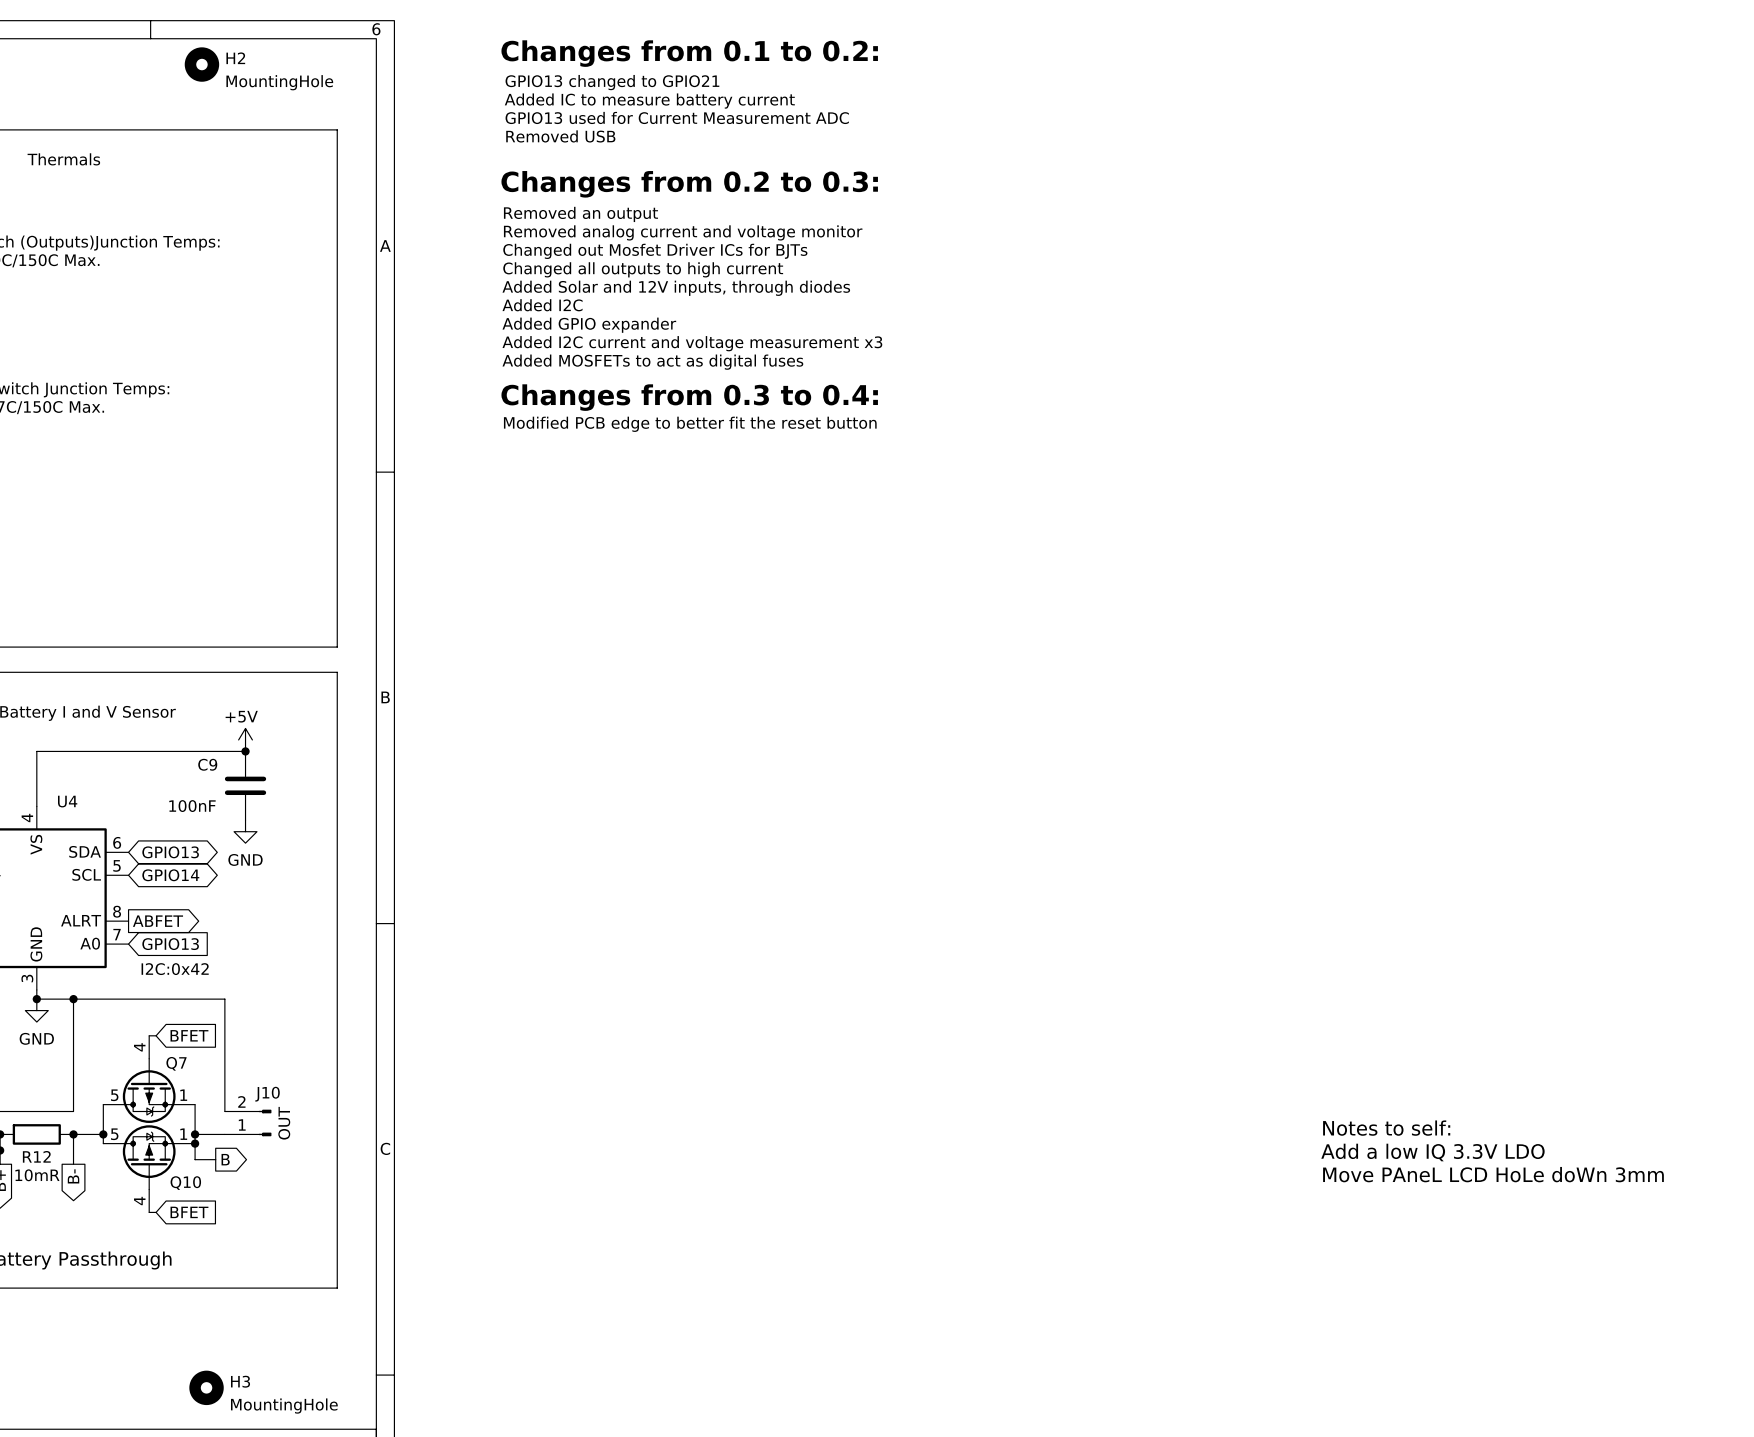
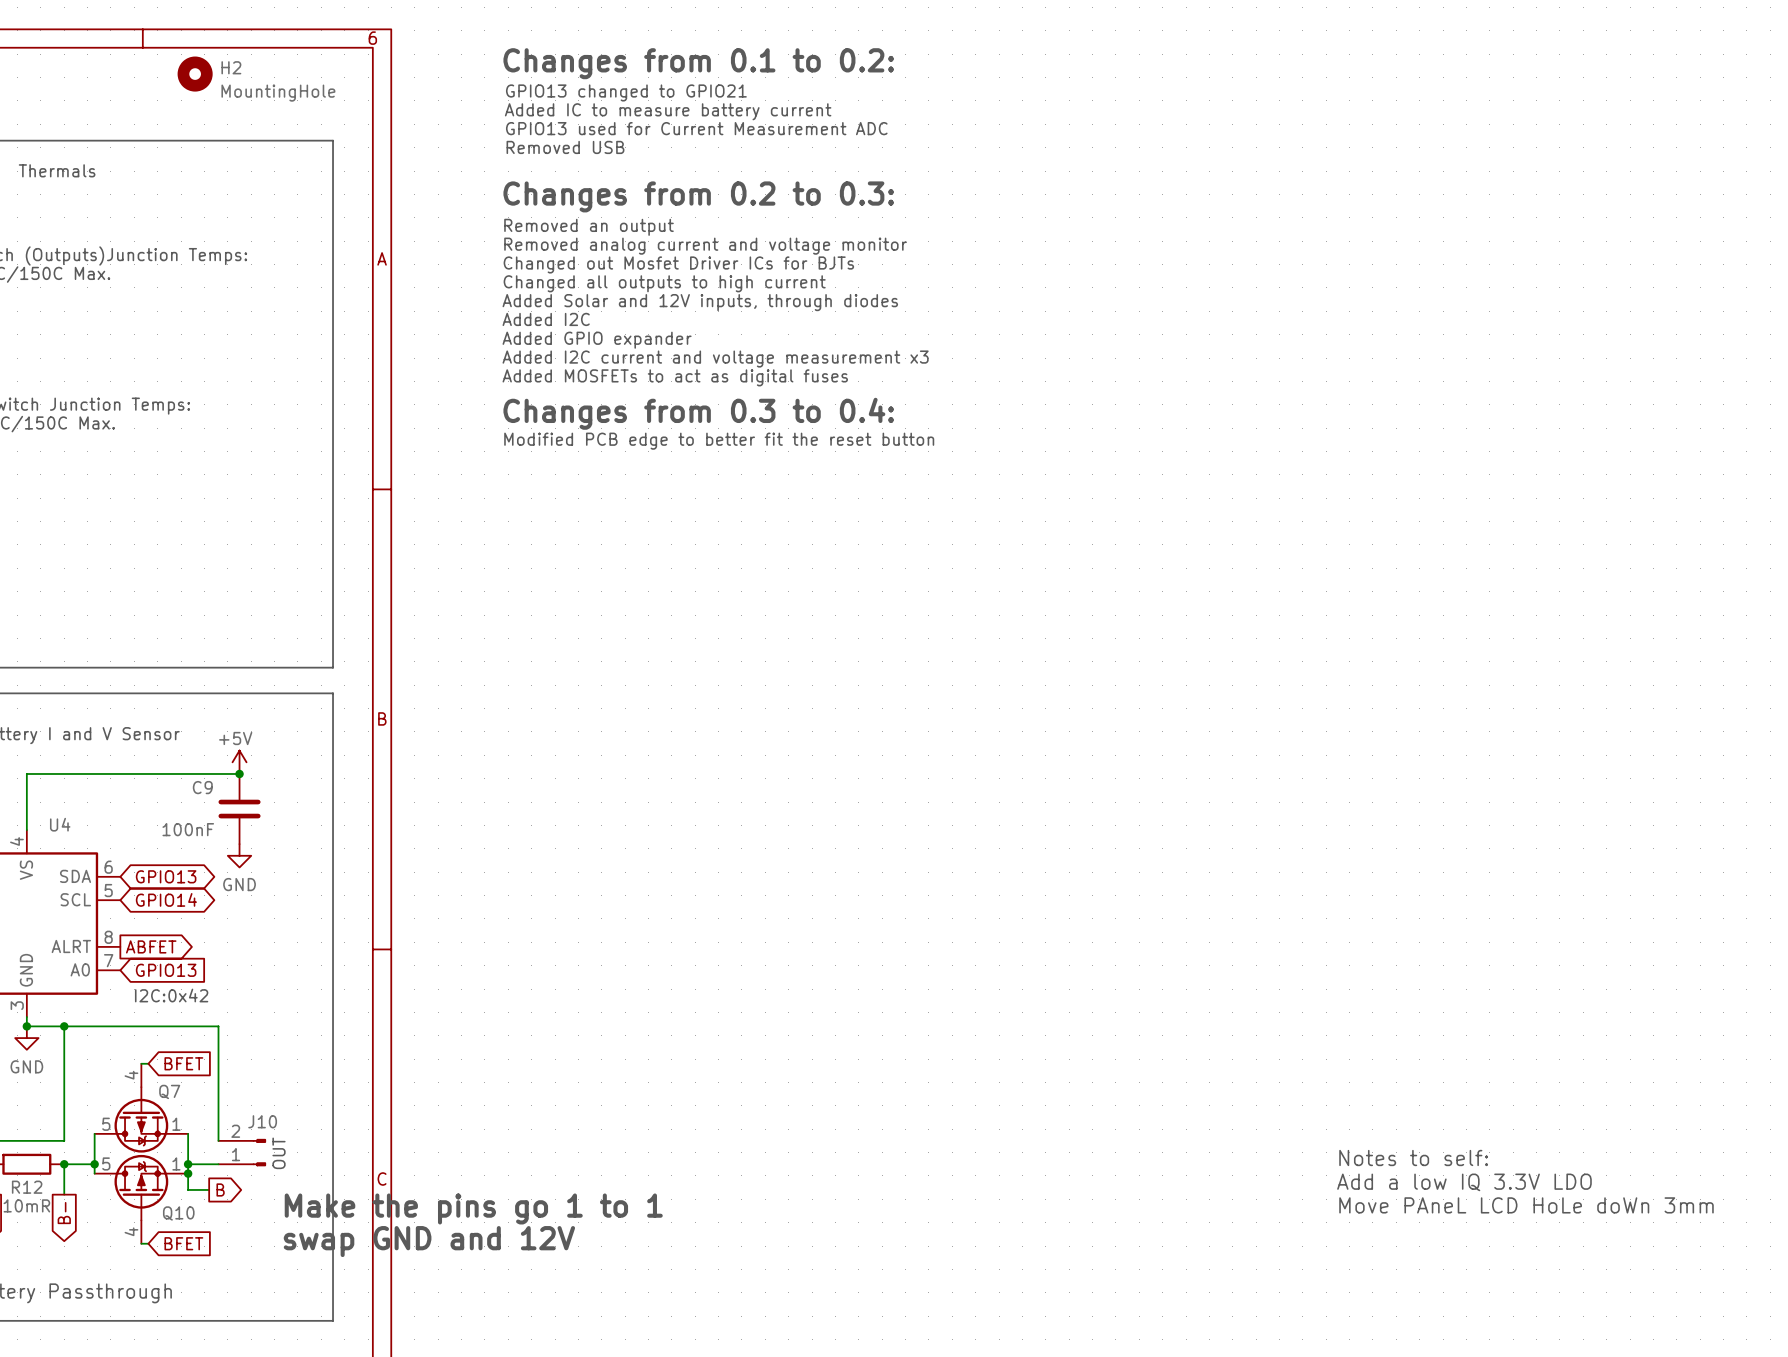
text: none -> Make the pins go 1 to 1 (473, 1208)
text: none -> swap GND and 12V (429, 1241)

